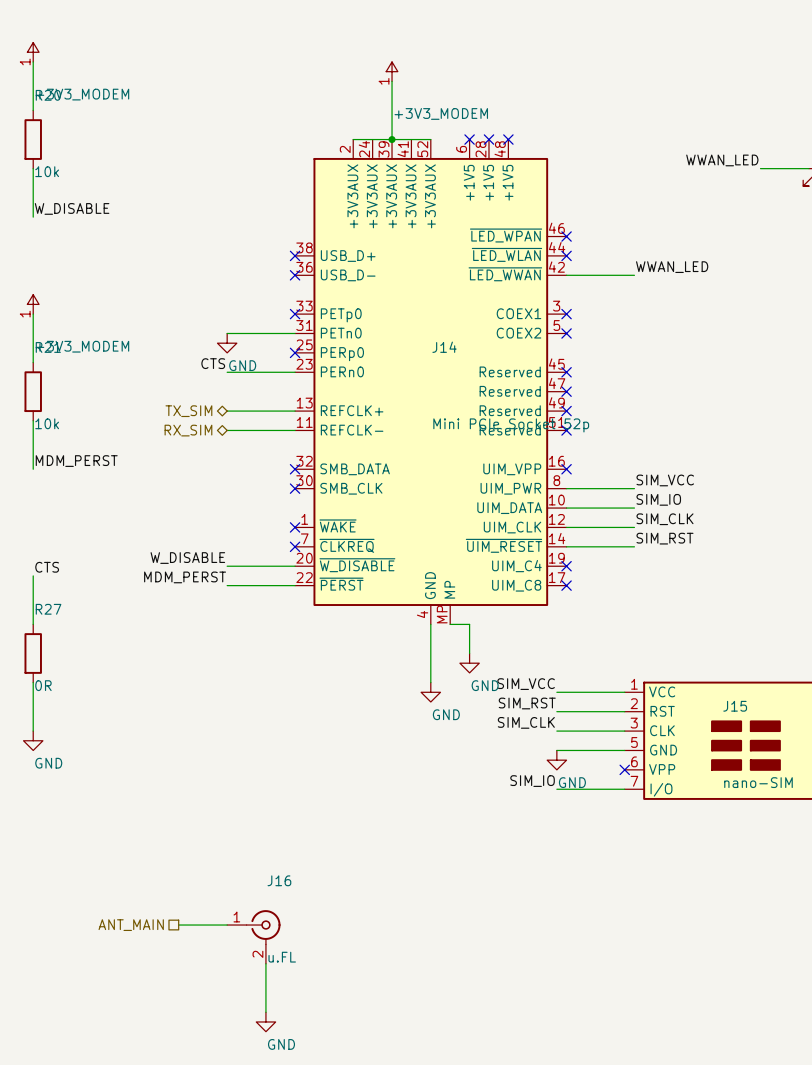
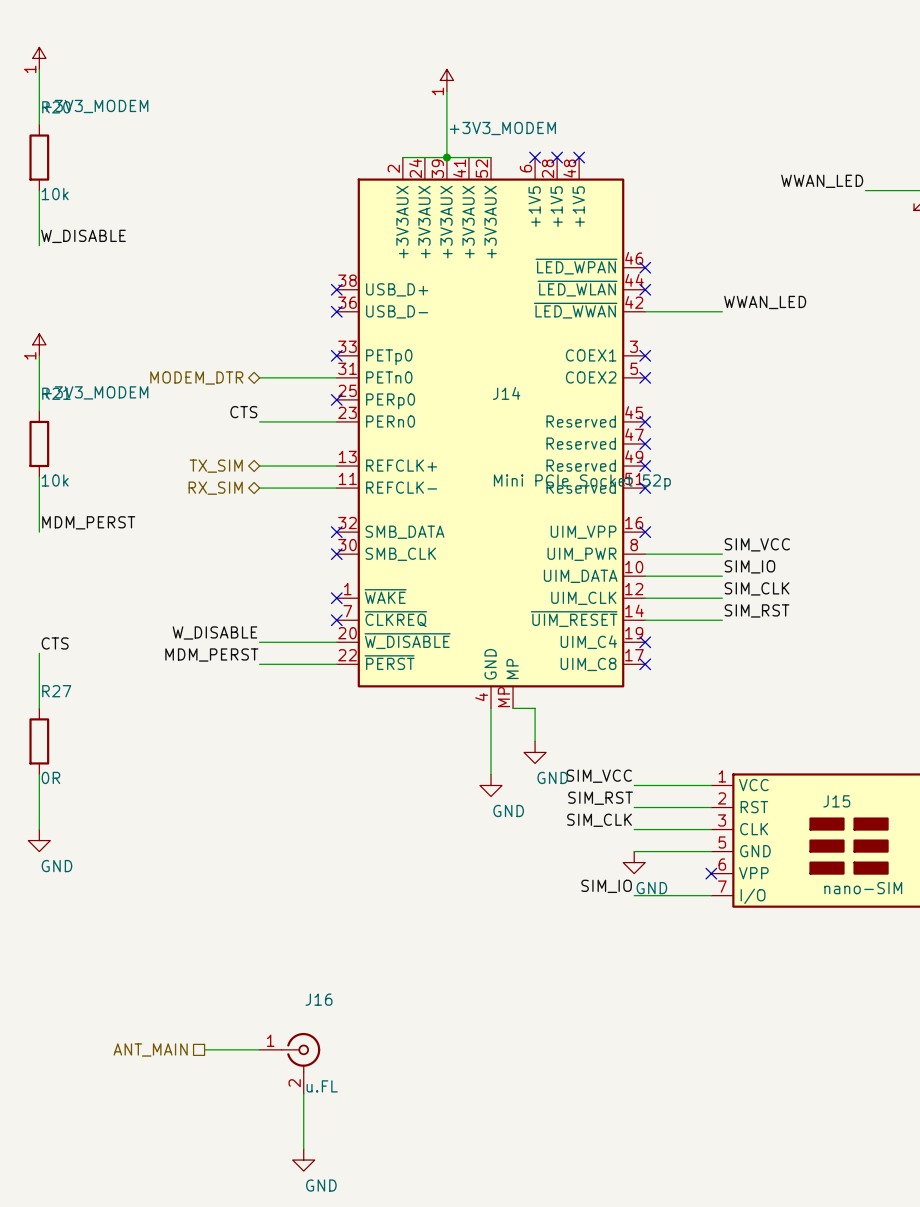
hierarchical label: none -> MODEM_DTR (196, 377)
power symbol: GND (227, 343) -> none

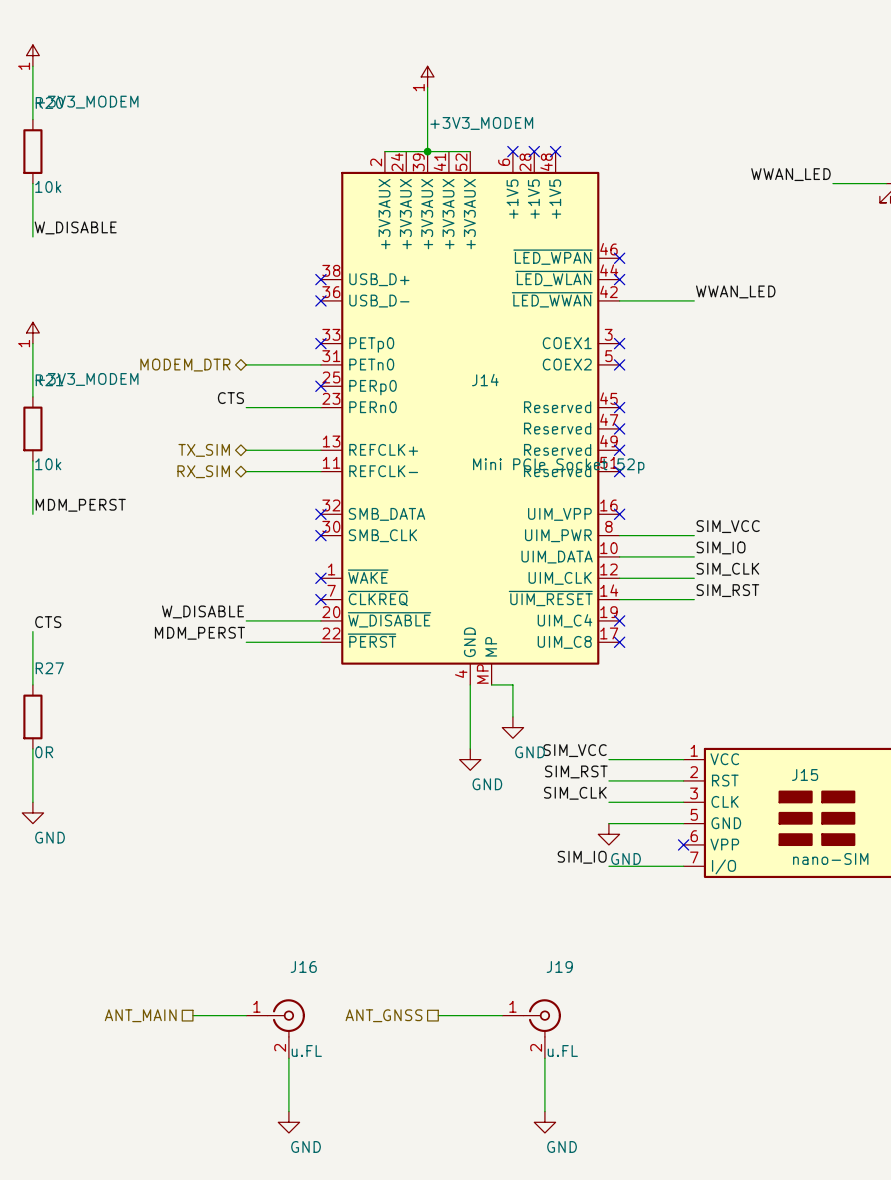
hierarchical label: none -> ANT_GNSS (384, 1015)
wire: none -> (438, 1015) (502, 1015)
J19: none -> u.FL (531, 1028)
wire: none -> (544, 1058) (544, 1111)
power symbol: none -> GND (544, 1122)

